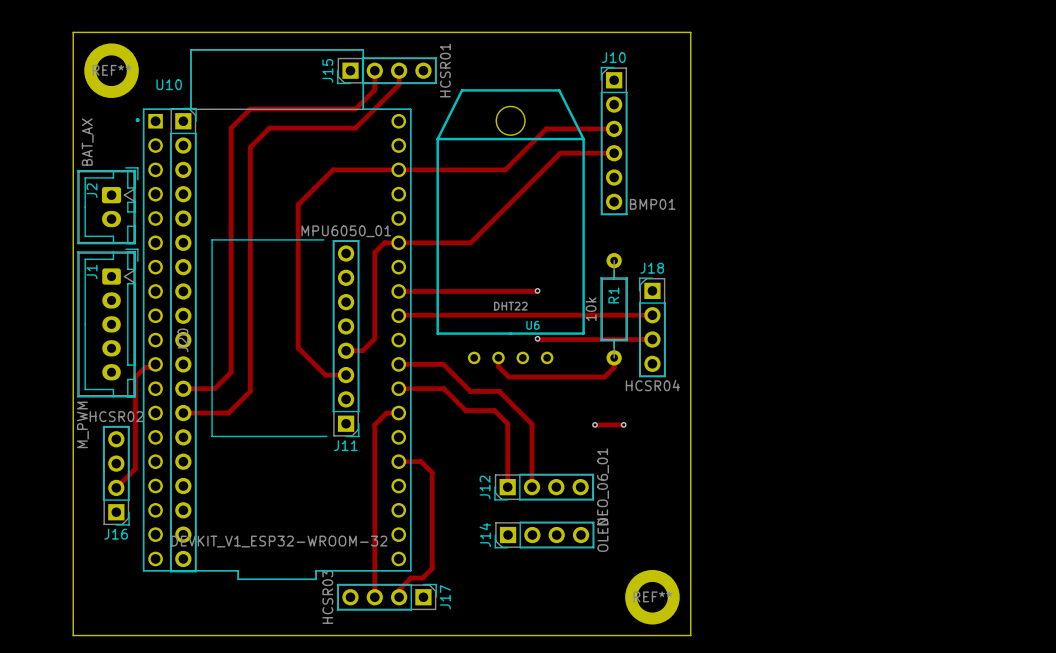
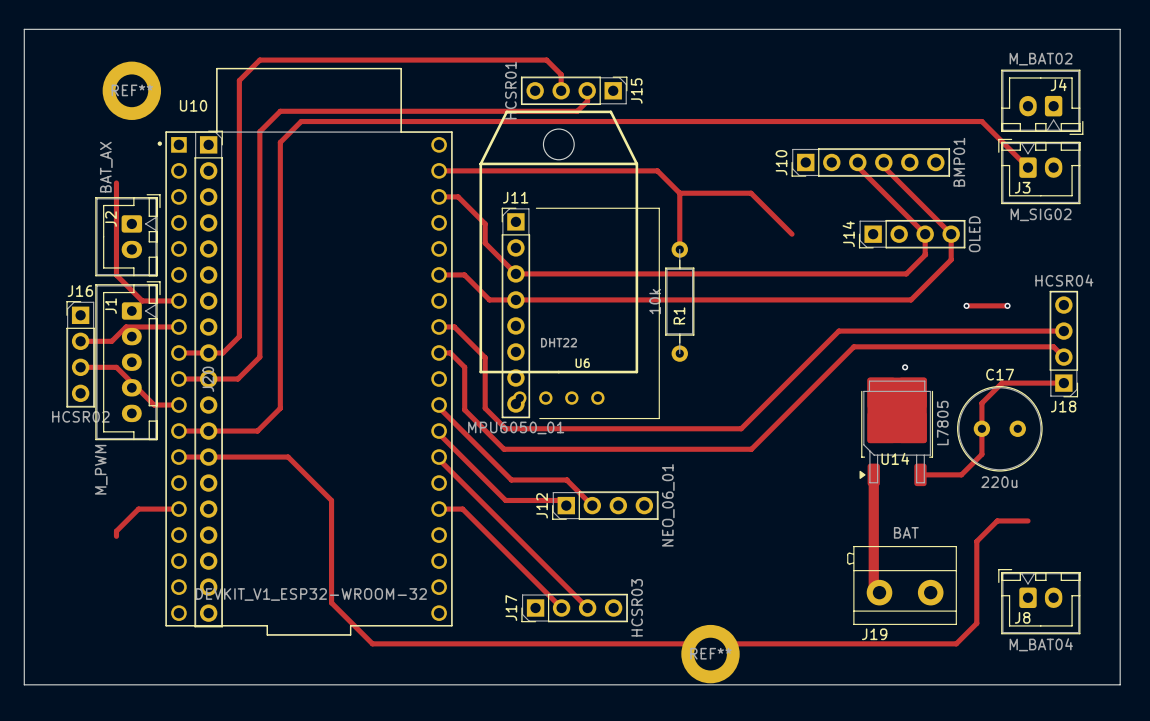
board edge: (73, 32) (690, 32) (690, 635) (73, 635) (73, 32) -> (24, 29) (24, 684) (1120, 684) (1120, 29) (24, 29)
track: (374, 70) (374, 89) (355, 108) (250, 108) (231, 128) -> (587, 90) (587, 101) (577, 111) (280, 111) (259, 131) (259, 152)
J15 rotation: 0° (386, 70) -> 180° (574, 90)
J15 position: (386, 70) -> (574, 90)
track: (399, 70) (399, 84) (355, 128) (269, 128) (250, 147) -> (1028, 167) (981, 121) (301, 121) (280, 142) (280, 172)
track: none -> (561, 90) (561, 74) (546, 60) (259, 60) (239, 80) (239, 336) (222, 352) (178, 352)
J4: none -> M_BAT02 (1042, 102)
track: (614, 128) (546, 128) (505, 169) (416, 169) -> (857, 162) (857, 166) (925, 234) (925, 254) (906, 273) (515, 273) (485, 243) (485, 223) (458, 196)
J10 rotation: 0° (614, 141) -> 90° counterclockwise (870, 162)
J10 position: (614, 141) -> (870, 162)
track: none -> (439, 170) (657, 170) (679, 193)
J3: none -> M_SIG02 (1039, 171)
track: (614, 153) (560, 153) (470, 242) (422, 242) -> (883, 162) (883, 166) (951, 234) (951, 259) (911, 299) (489, 299) (464, 274)
track: none -> (116, 182) (116, 275) (142, 300) (178, 300)
track: none -> (679, 193) (679, 249)
track: none -> (679, 193) (751, 193) (792, 234)
track: (398, 169) (333, 169) (298, 204) (298, 347) (325, 375) (346, 375) -> none
line: none -> (536, 208) (659, 208) (659, 418) (539, 418)
J10 value position: BMP01 (652, 204) -> BMP01 (959, 162)
line: (323, 239) (212, 239) (212, 436) (326, 436) -> none
track: (398, 242) (384, 242) (374, 252) (374, 338) (362, 350) (346, 350) -> none
track: none -> (966, 305) (1007, 305)
via: none -> (966, 305)
via: none -> (1007, 305)
track: (537, 290) (413, 291) -> (1063, 331) (838, 331) (741, 428) (505, 428) (485, 408) (485, 357) (454, 326)
via: (537, 290) -> none
track: none -> (178, 326) (126, 326) (111, 341) (80, 341)
R1 name position: R1 (613, 295) -> R1 (679, 315)
R1 position: (614, 309) -> (679, 301)
track: (652, 315) (398, 315) -> (1063, 357) (1053, 346) (853, 346) (751, 449) (504, 449) (464, 409) (464, 367) (450, 352) (439, 352)
track: (231, 319) (231, 372) (214, 388) -> (259, 357) (237, 379) (178, 379)
J18 rotation: 0° (652, 327) -> 180° (1063, 344)
J18 position: (652, 327) -> (1063, 344)
via: none -> (905, 367)
J11 rotation: 0° (346, 338) -> 180° (515, 312)
J11 position: (346, 338) -> (515, 312)
track: (537, 338) (652, 339) -> none
via: (537, 338) -> none
track: none -> (1063, 383) (1001, 383) (981, 403) (981, 454) (961, 474) (920, 474)
track: (498, 357) (498, 366) (508, 377) (604, 377) (614, 367) (614, 357) -> none
track: (155, 364) (152, 367) (145, 367) (135, 377) (135, 468) (116, 487) -> (178, 405) (154, 405) (116, 367) (80, 367)
track: (398, 364) (443, 364) (470, 391) (499, 391) (532, 424) (532, 487) -> none
track: none -> (439, 407) (511, 479) (567, 479) (592, 505)
track: (250, 367) (250, 391) (228, 413) -> (280, 408) (257, 431) (242, 431)
C17: none -> 220u (999, 428)
track: none -> (178, 431) (208, 431)
track: (398, 388) (443, 388) (465, 410) (494, 410) (507, 423) (507, 487) -> none
U14: none -> L7805 (896, 431)
track: none -> (439, 433) (505, 500) (561, 500) (566, 505)
track: none -> (178, 457) (208, 457)
track: none -> (257, 457) (288, 457) (331, 500) (331, 602) (372, 643) (956, 643) (976, 623) (976, 541) (997, 520) (1028, 520)
track: (398, 413) (386, 413) (374, 424) (374, 597) -> none
track: none -> (439, 459) (587, 608)
track: (595, 424) (623, 424) -> none
via: (595, 424) -> none
via: (623, 424) -> none
track: none -> (873, 474) (873, 586) (879, 592)
track: none -> (178, 509) (138, 509) (116, 531) (116, 536)
track: (420, 461) (432, 472) (432, 568) (422, 578) (410, 578) (399, 589) (399, 597) -> (462, 509) (561, 608)
J16 rotation: 0° (116, 475) -> 180° (80, 354)
J16 position: (116, 475) -> (80, 354)
J12 position: (544, 487) -> (605, 505)
J19: none -> BAT (902, 585)
J14 position: (544, 535) -> (912, 234)
J8: none -> M_BAT04 (1039, 601)
J17 rotation: 0° (386, 597) -> 180° (574, 608)
J17 position: (386, 597) -> (574, 608)

